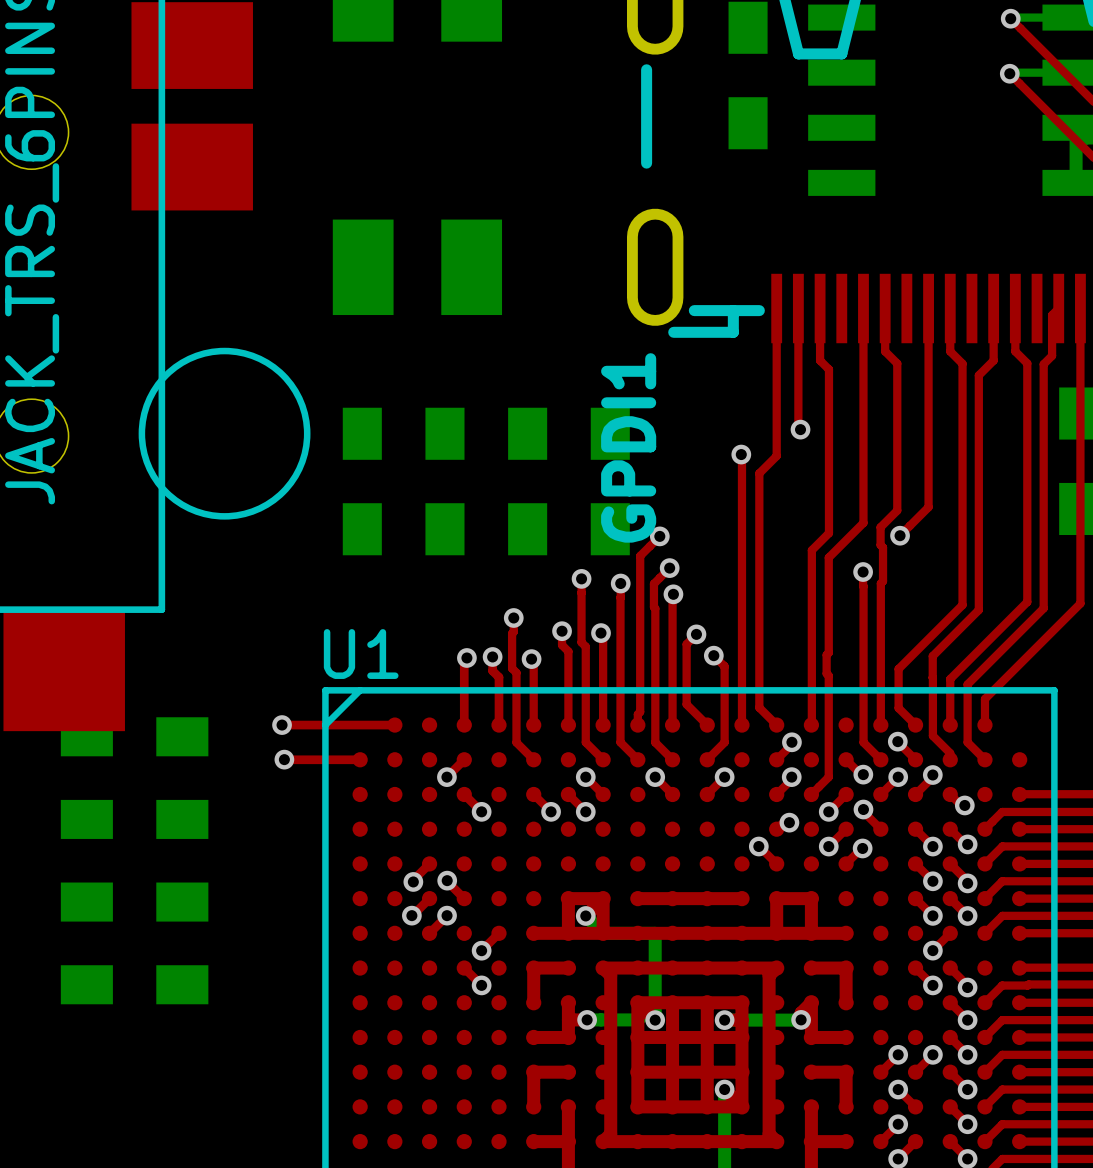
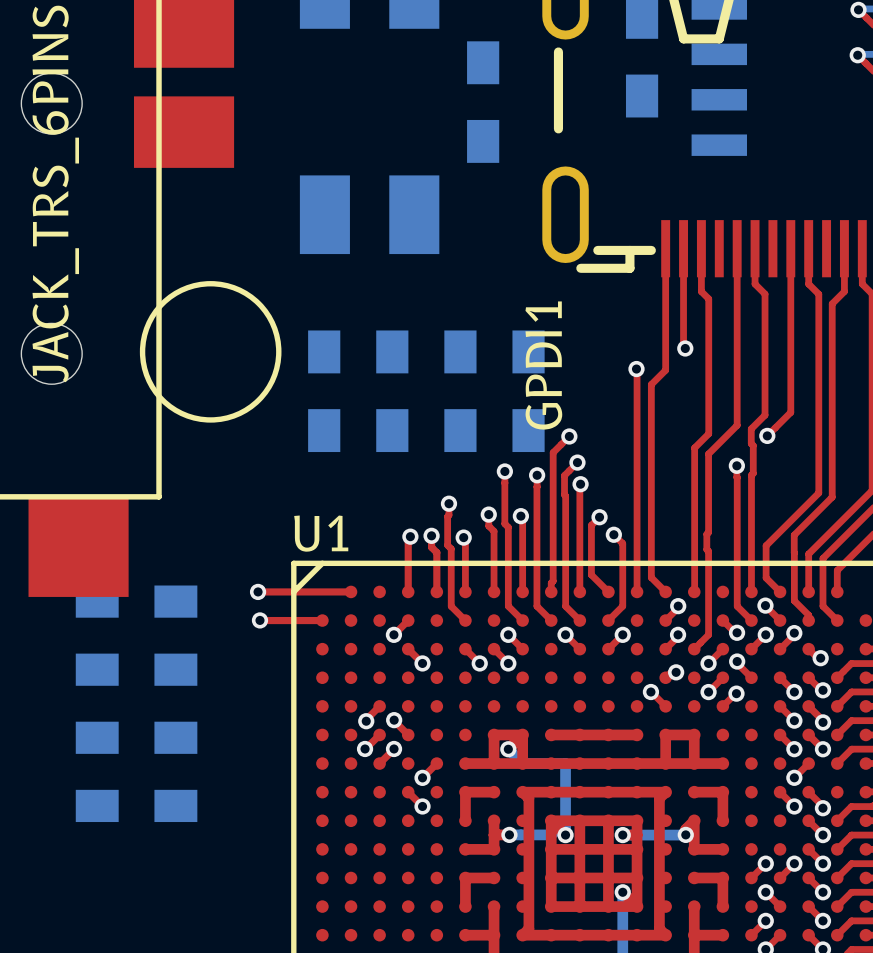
part: none -> (483, 102)

